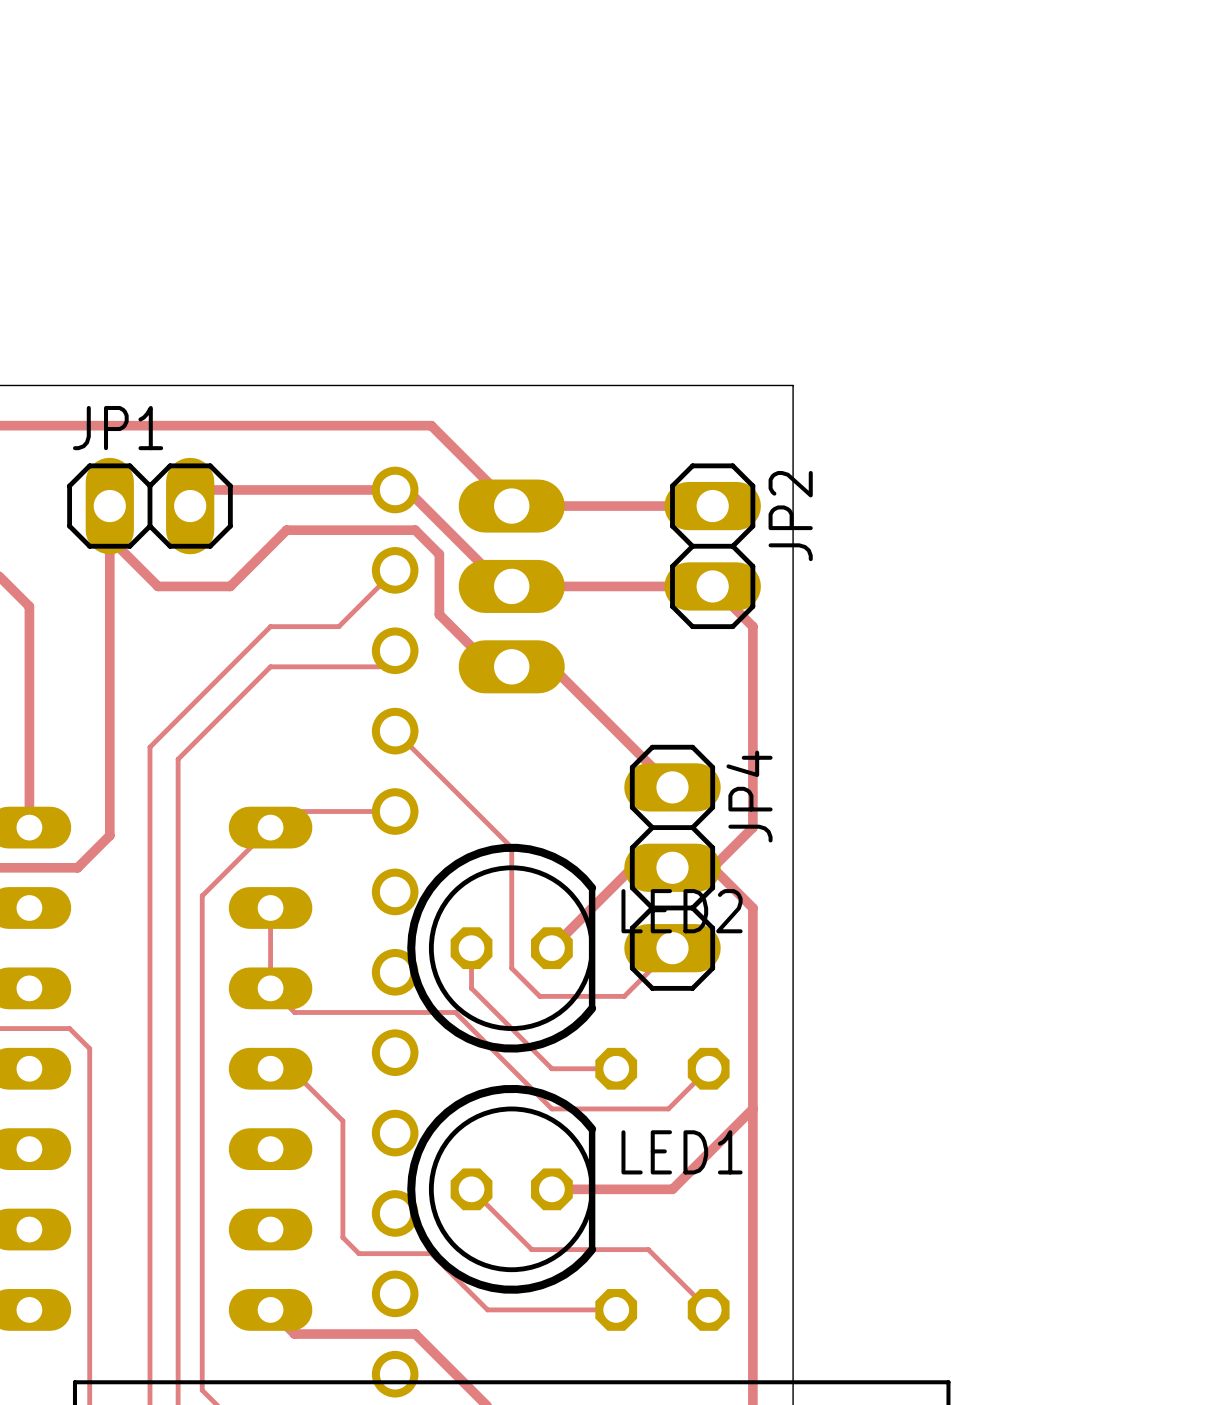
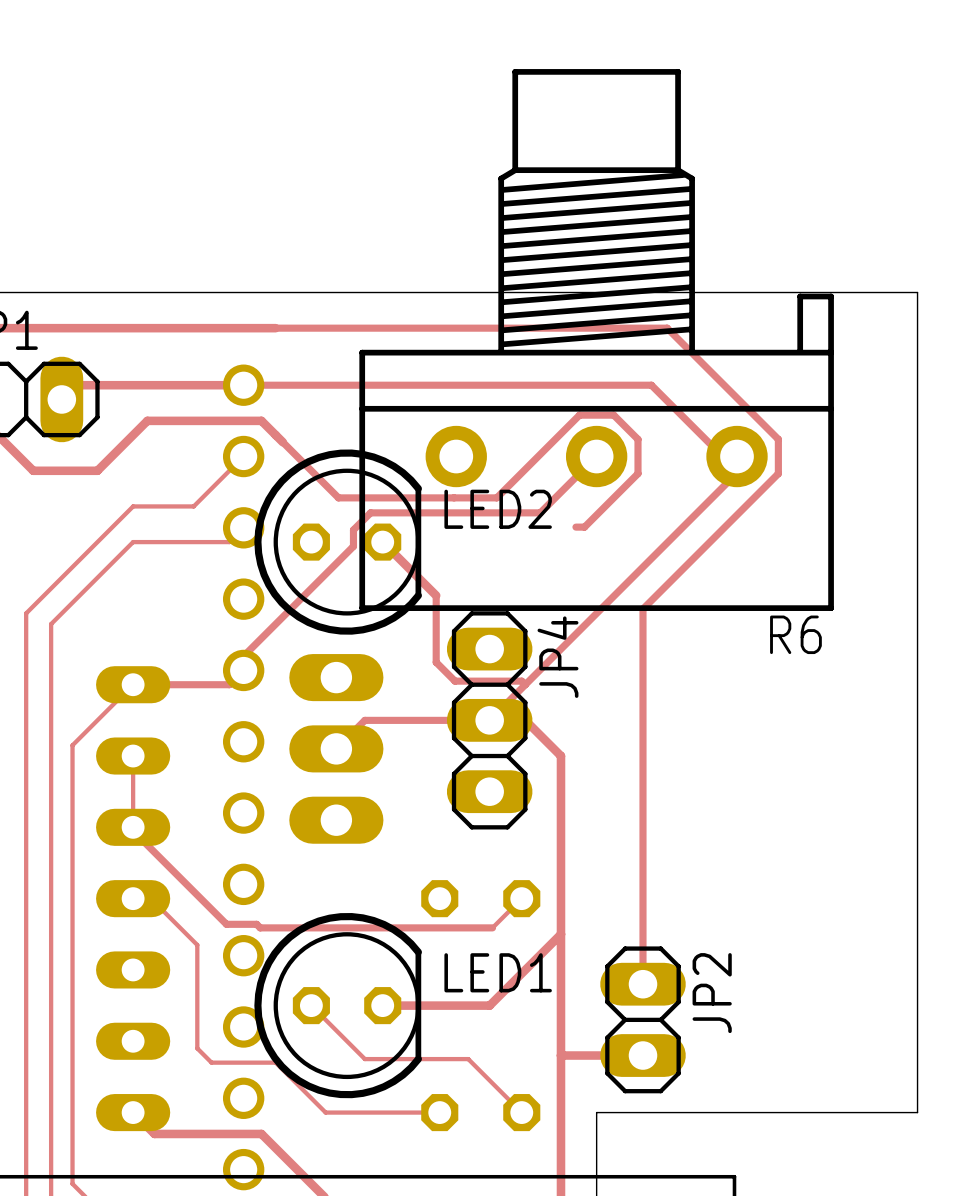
board edge: (793, 385) (793, 1309) -> (596, 292) (917, 292) (917, 1112) (596, 1112)
top track: (431, 425) (511, 506) (712, 506) -> (275, 328) (667, 328) (778, 439) (778, 473) (642, 609) (642, 984)
R6: none -> (596, 340)
top track: none -> (243, 385) (651, 385) (737, 470)
top track: (407, 489) (503, 586) (712, 586) (752, 626) (752, 827) (712, 867) -> none
top track: none -> (275, 435) (338, 497) (496, 497) (579, 415) (613, 415) (638, 439) (638, 473) (584, 527) (575, 527)
JP2 position: (712, 546) -> (642, 1019)
top track: (439, 554) (439, 614) (491, 666) (551, 666) -> none
top track: none -> (737, 456) (737, 473) (489, 720)
part position: (511, 586) -> (336, 748)
top track: (612, 727) (672, 787) -> (436, 595) (436, 662) (454, 681) (521, 681) (525, 684)
top track: (395, 731) (511, 847) (511, 968) (539, 996) (624, 996) (672, 948) -> none
top track: (395, 811) (286, 811) (270, 827) -> (596, 456) (540, 512) (370, 512) (353, 529) (353, 546) (243, 656) (243, 670) (229, 684) (133, 684)
top track: (632, 867) (551, 948) -> (454, 720) (364, 720) (336, 748)
top track: (471, 948) (471, 988) (551, 1068) (616, 1068) -> none
LED2 position: (501, 948) -> (338, 542)
top track: (270, 988) (294, 1012) (455, 1012) (551, 1108) (668, 1108) (675, 1101) -> (133, 827) (133, 830) (226, 924) (256, 924) (260, 927) (492, 927)
top track: none -> (560, 1055) (642, 1055)

